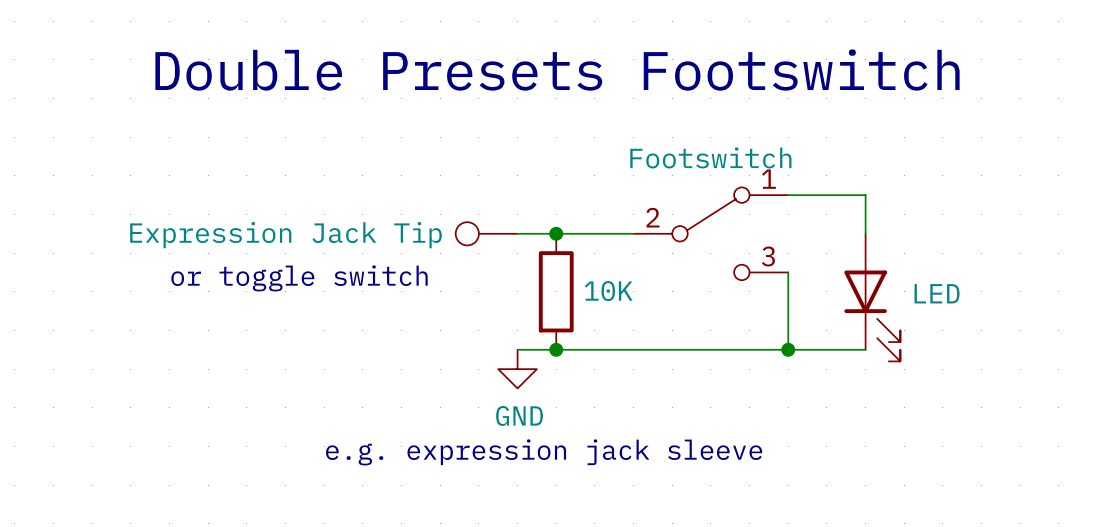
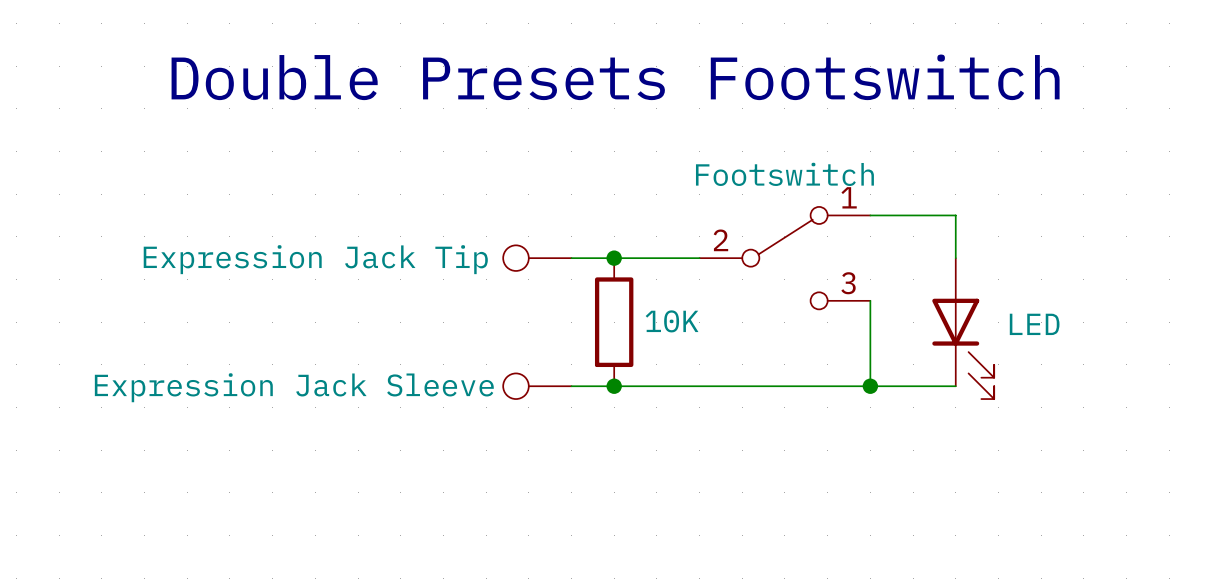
text: or toggle switch (299, 278) -> none
part: none -> Expression Jack Sleeve (537, 386)
power symbol: GND (517, 369) -> none
text: e.g. expression jack sleeve (544, 452) -> none

